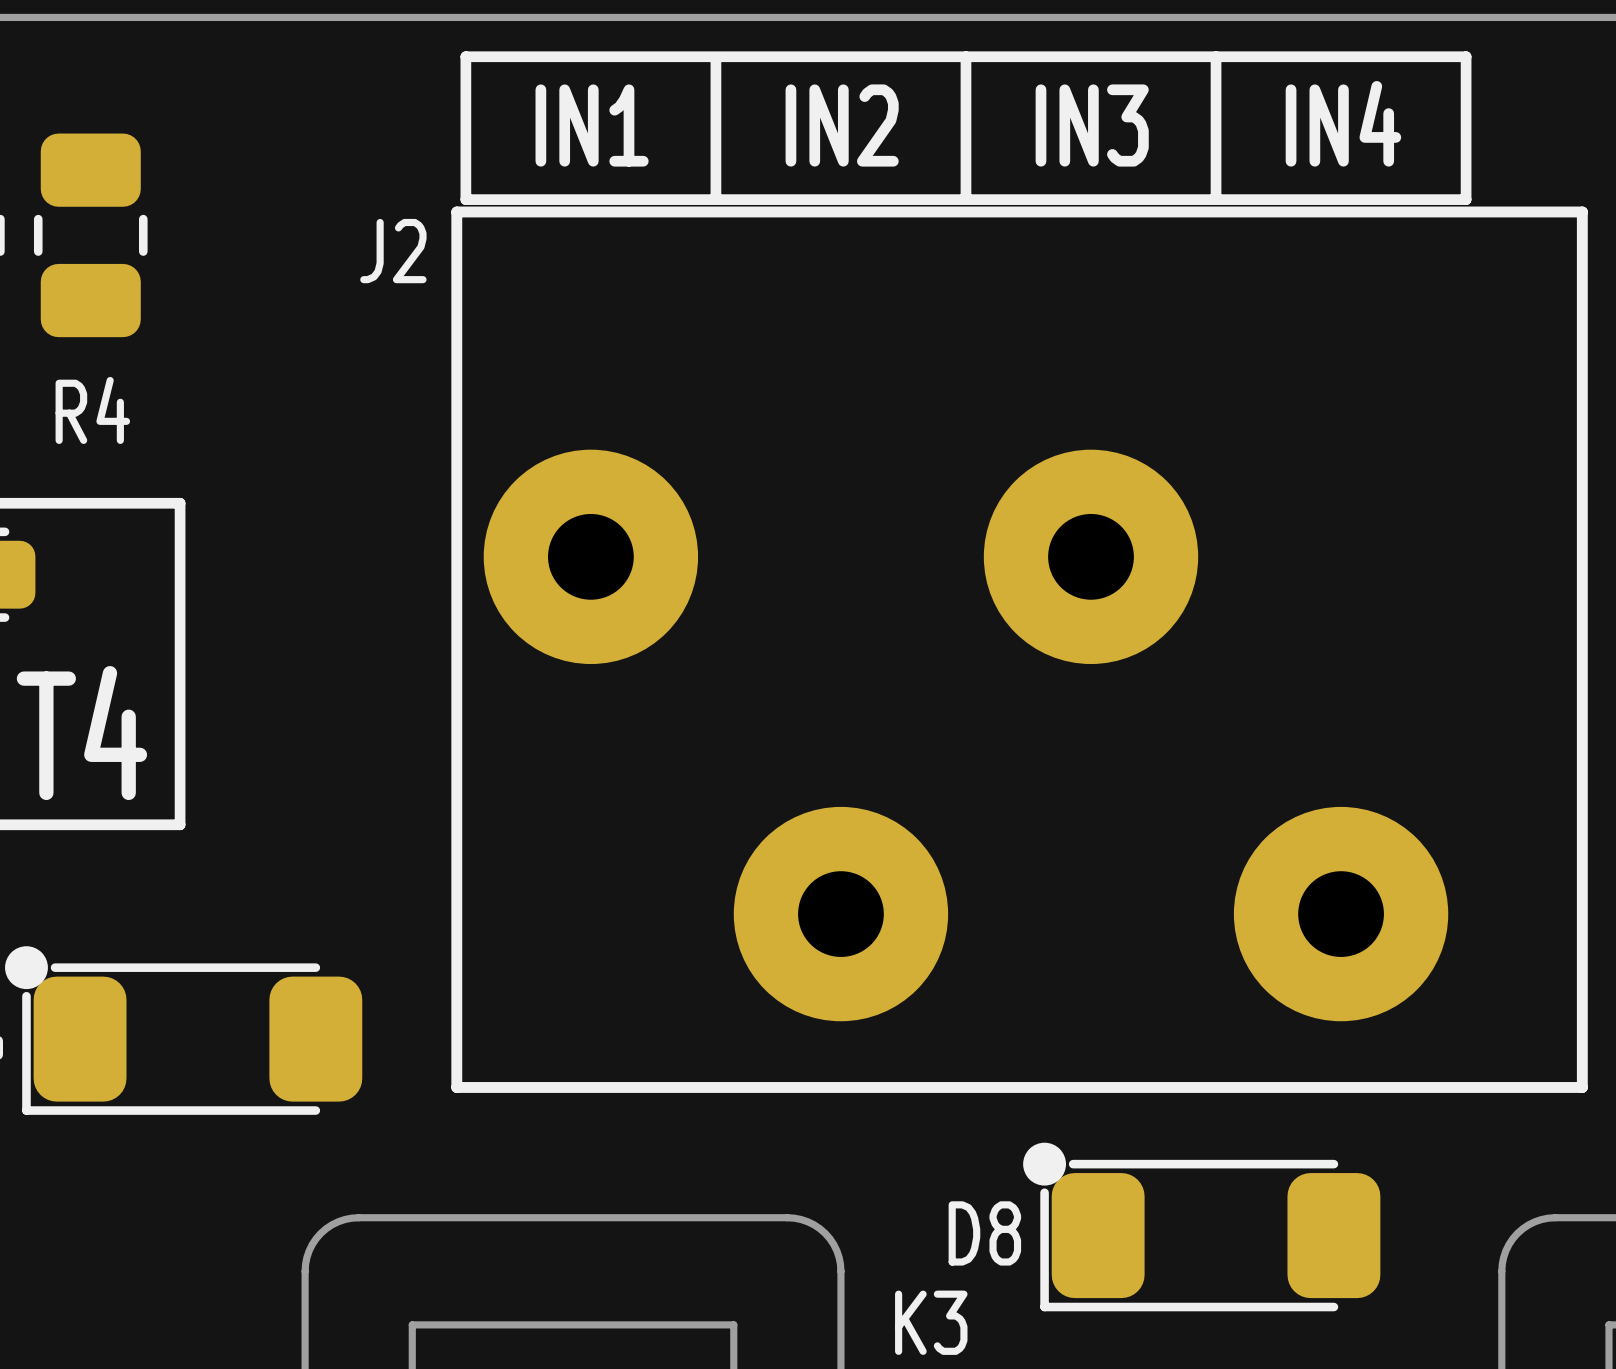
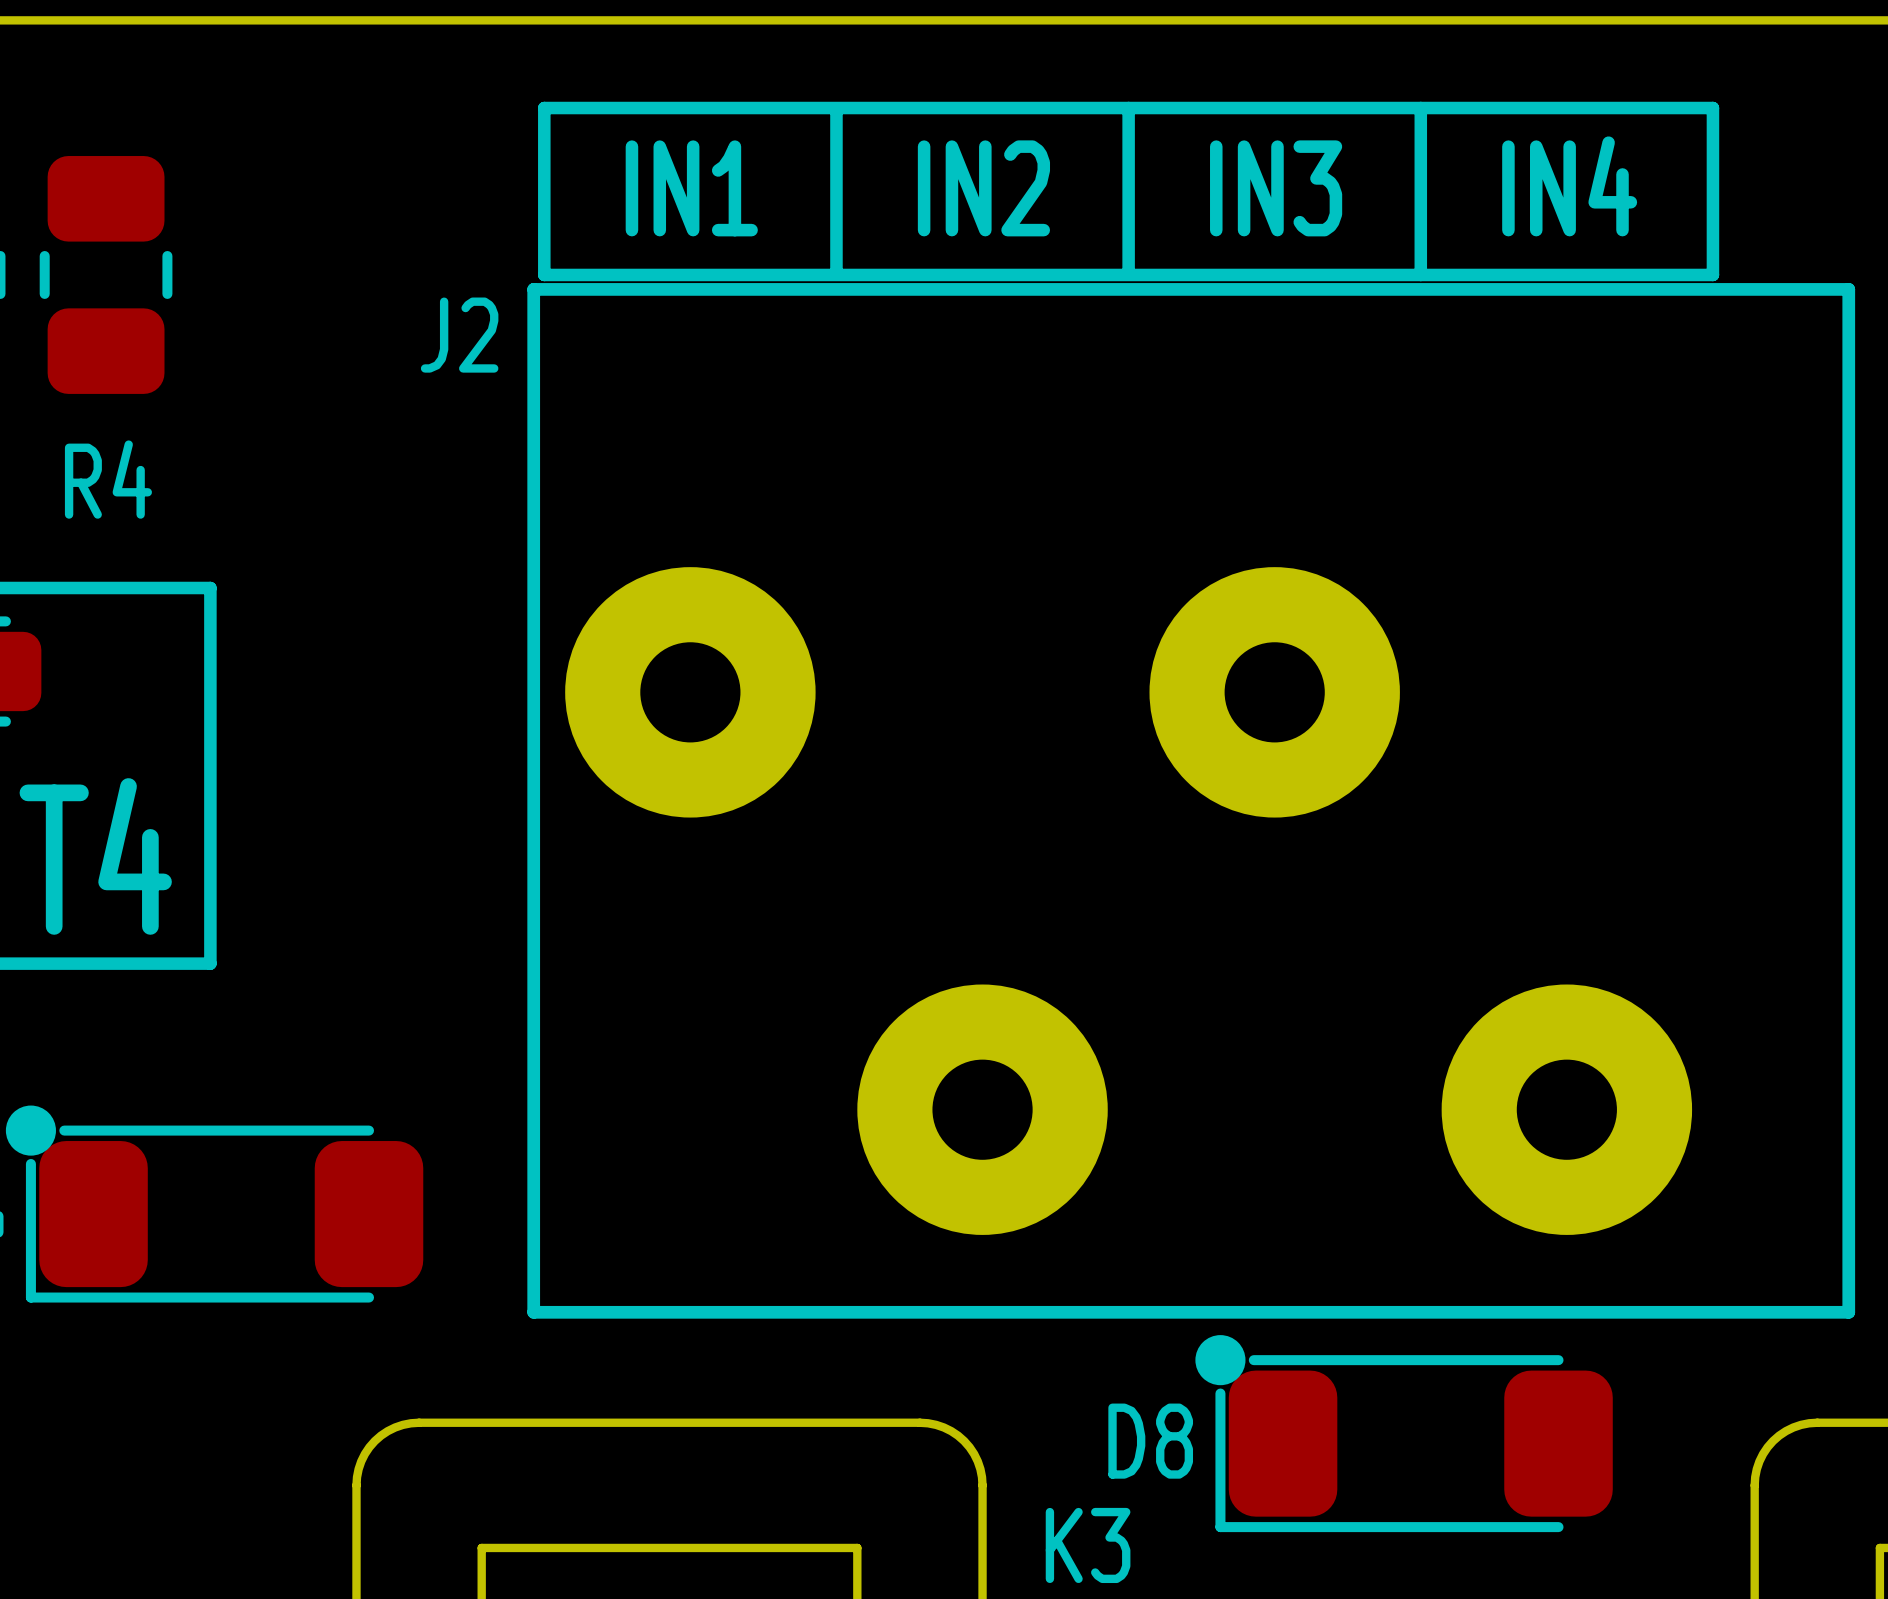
line: (965, 56) (965, 92) -> (1128, 231) (1128, 273)
line: (1216, 56) (1216, 92) -> (1420, 233) (1420, 274)
line: (715, 57) (715, 93) -> (836, 232) (836, 274)
line: (465, 92) (465, 56) (1466, 56) (1466, 92) -> (544, 108) (1712, 108)
text position: IN4 (1343, 123) -> IN4 (1569, 186)
text position: IN1 (592, 125) -> IN1 (691, 188)
text position: IN2 (842, 125) -> IN2 (983, 188)
text position: IN3 (1092, 125) -> IN3 (1276, 188)
line: (465, 199) (1466, 199) -> (544, 233) (544, 274) (1712, 274) (1712, 233)
J2 position: (1019, 649) -> (1191, 800)

